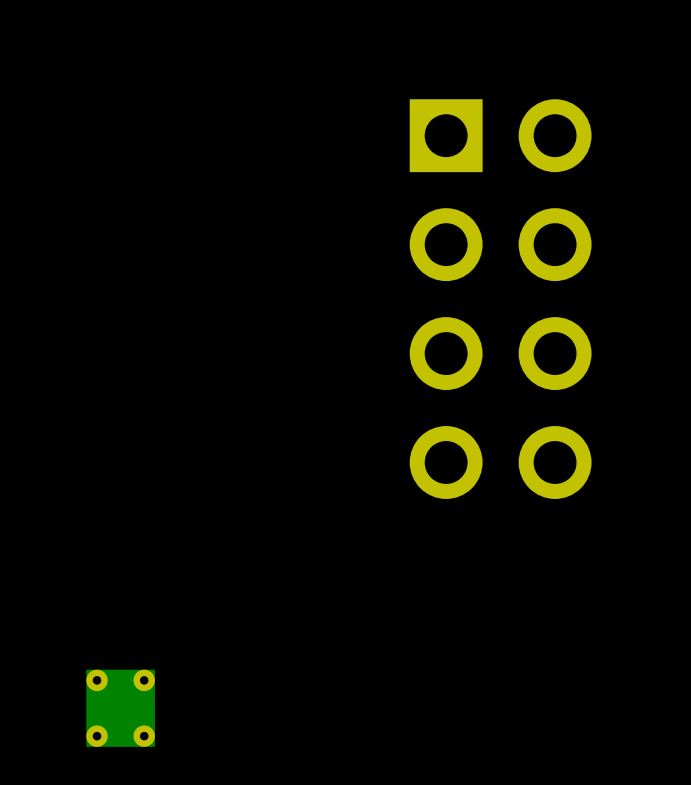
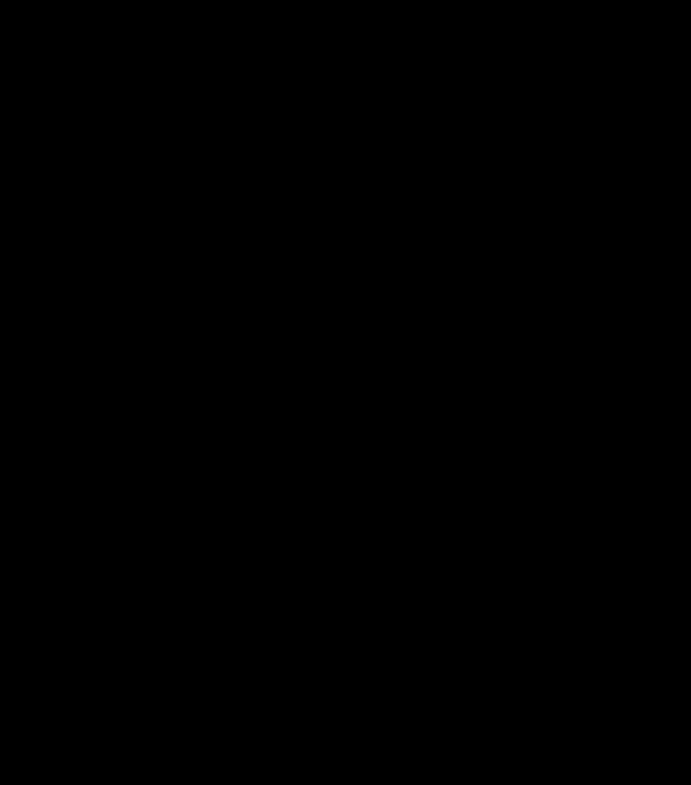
part: (500, 299) -> none
part: (120, 708) -> none

